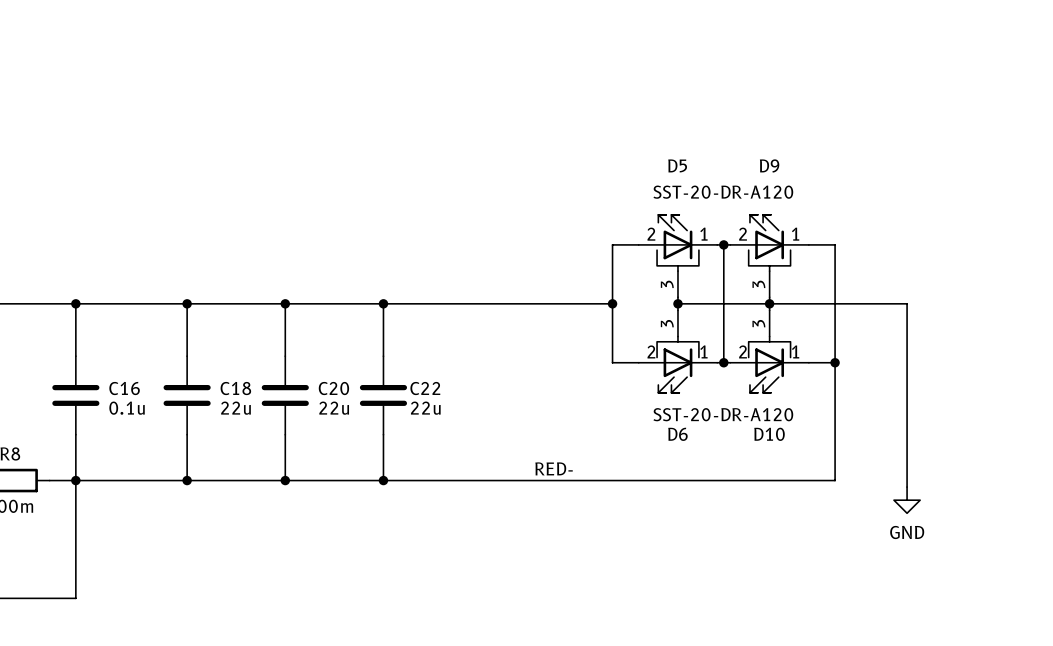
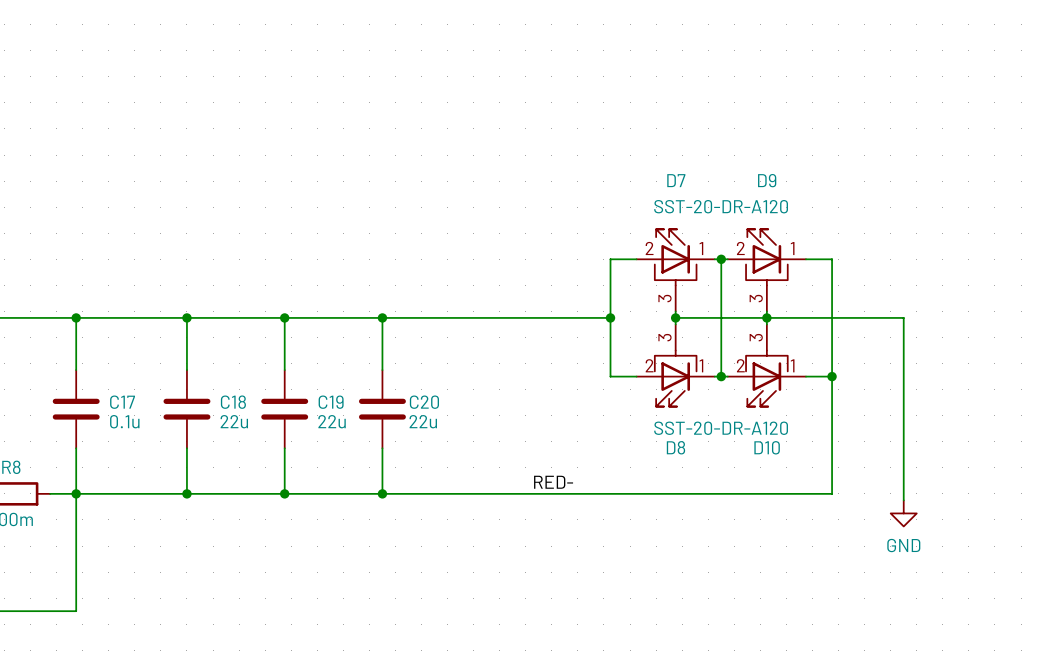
D5 name: D5 (677, 165) -> D7 (676, 180)
C16 name: C16 (124, 388) -> C17 (122, 402)
C20 name: C20 (333, 388) -> C19 (331, 402)
C22 name: C22 (425, 388) -> C20 (424, 402)
D6 name: D6 (677, 434) -> D8 (675, 447)

